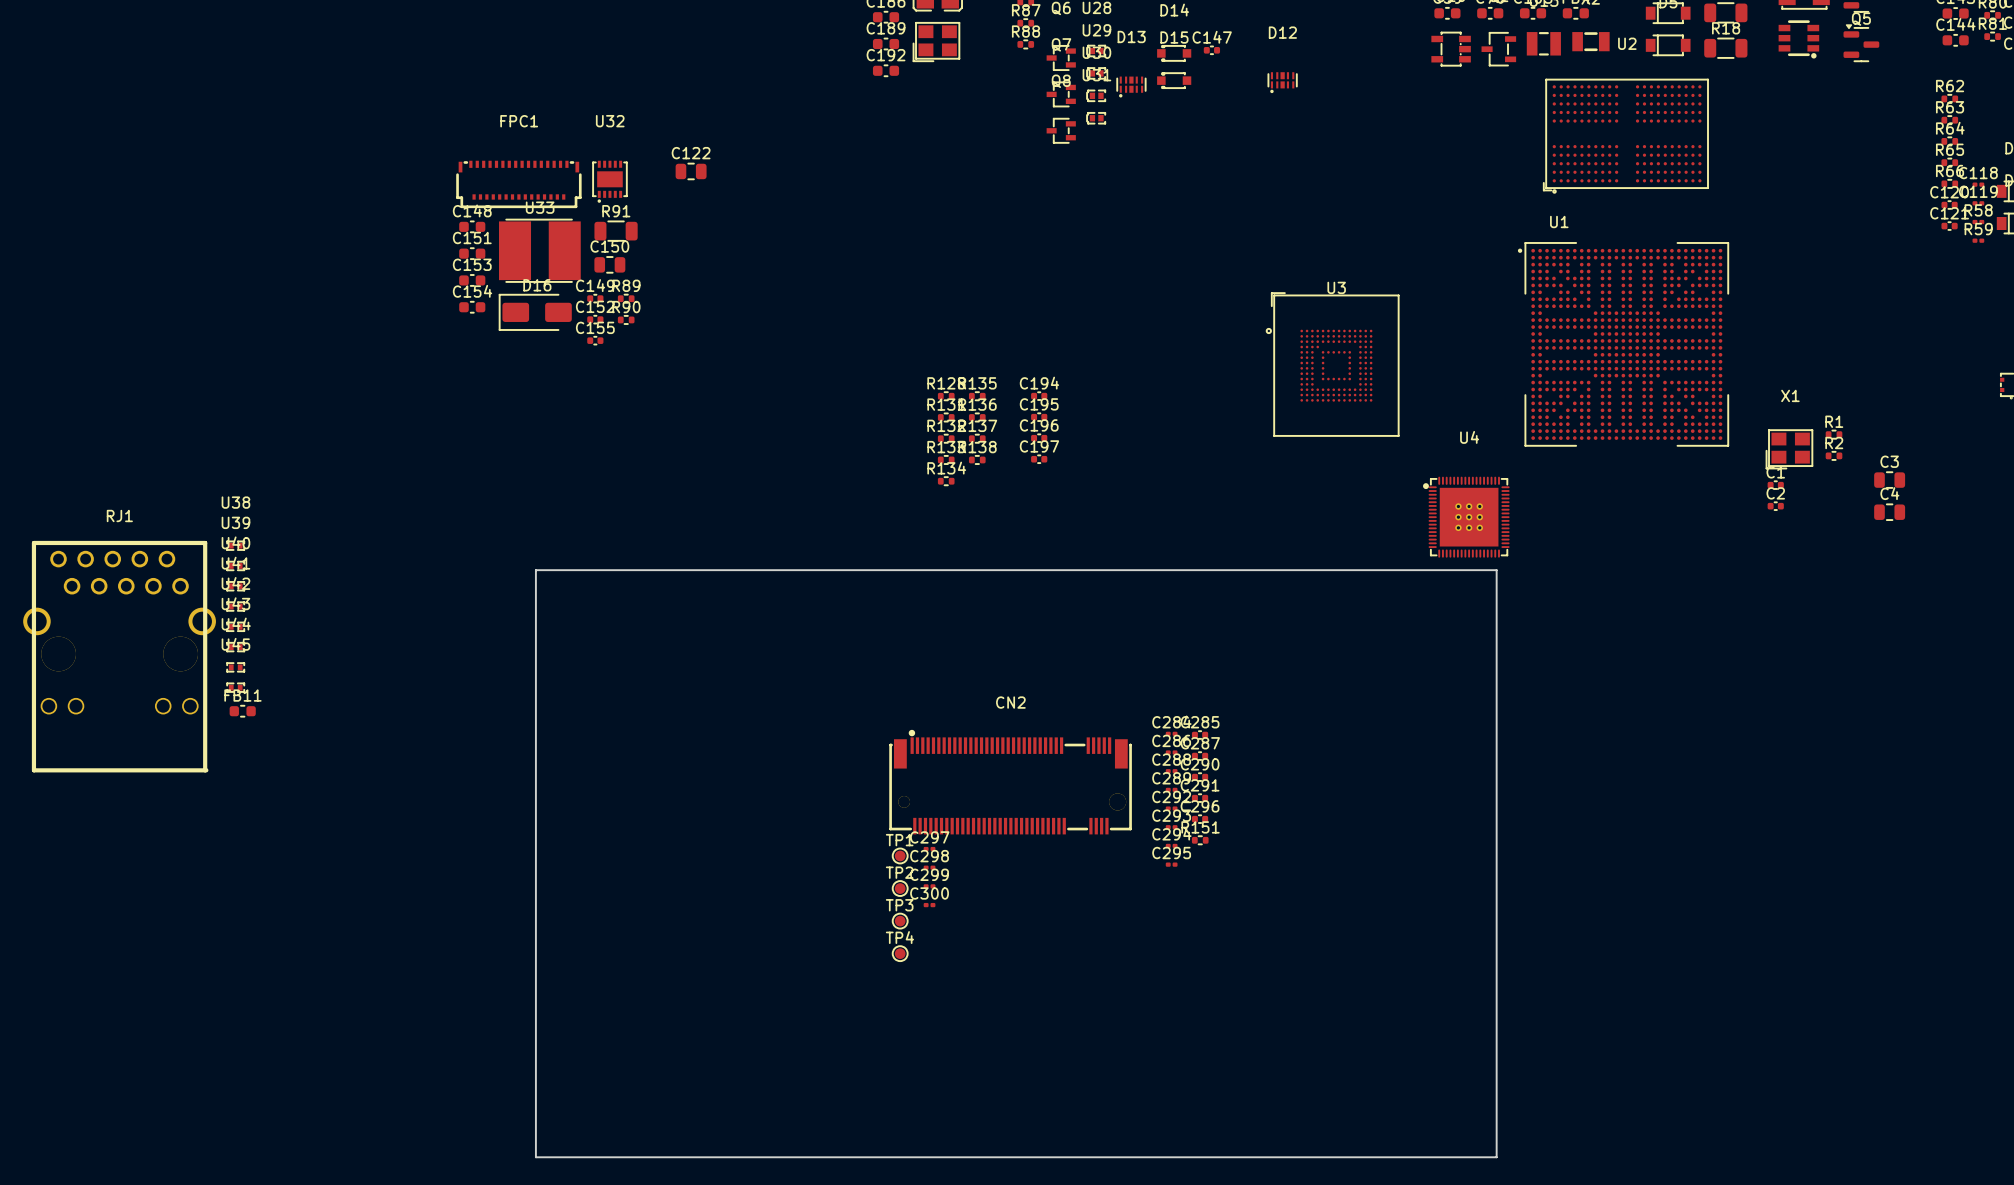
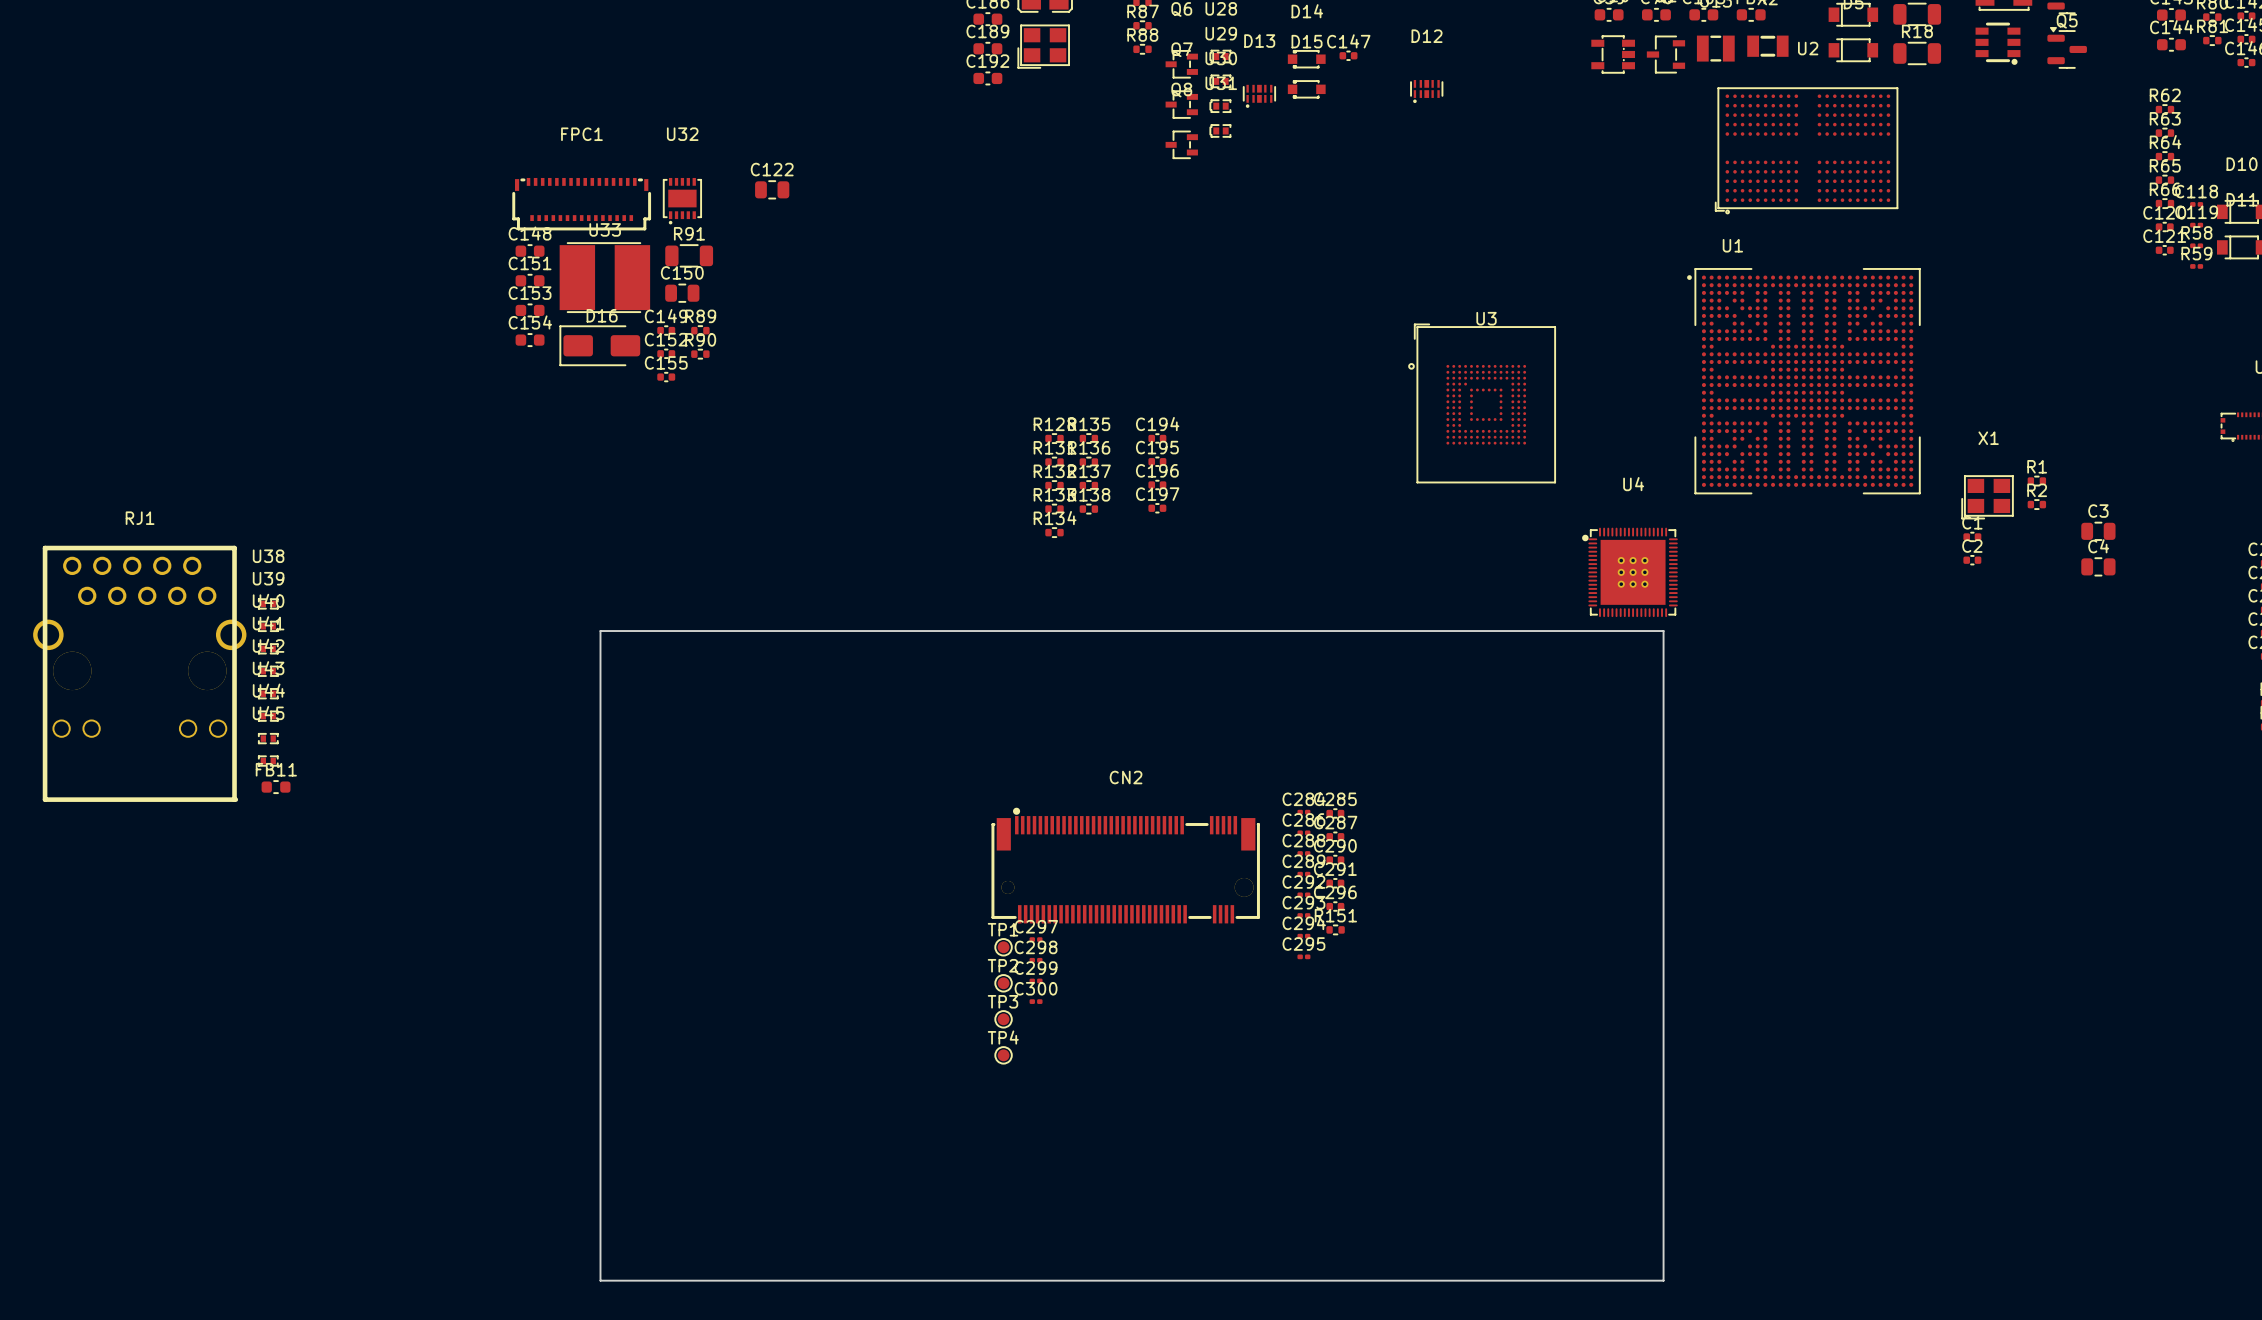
RJ1 position: (119, 656) -> (139, 673)

